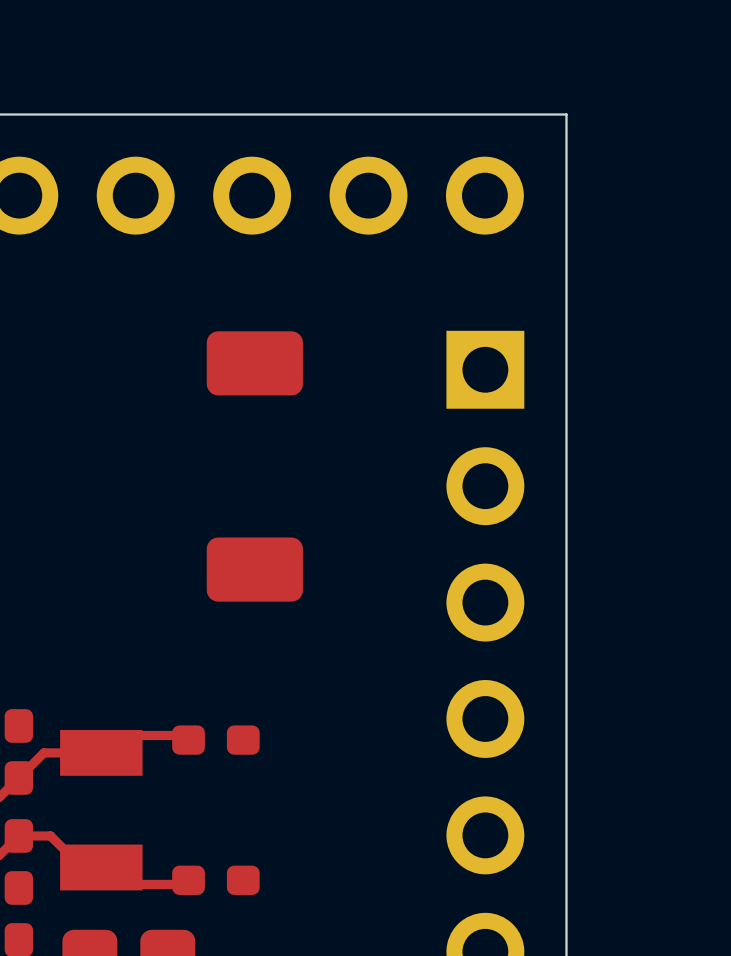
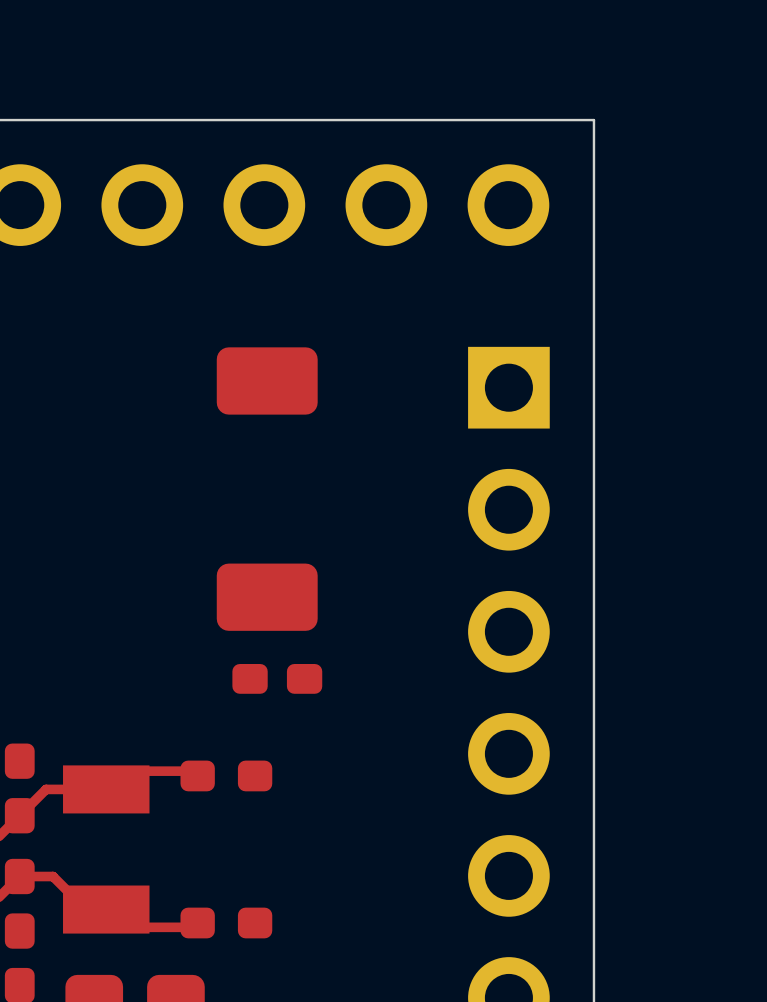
part: none -> (277, 678)

